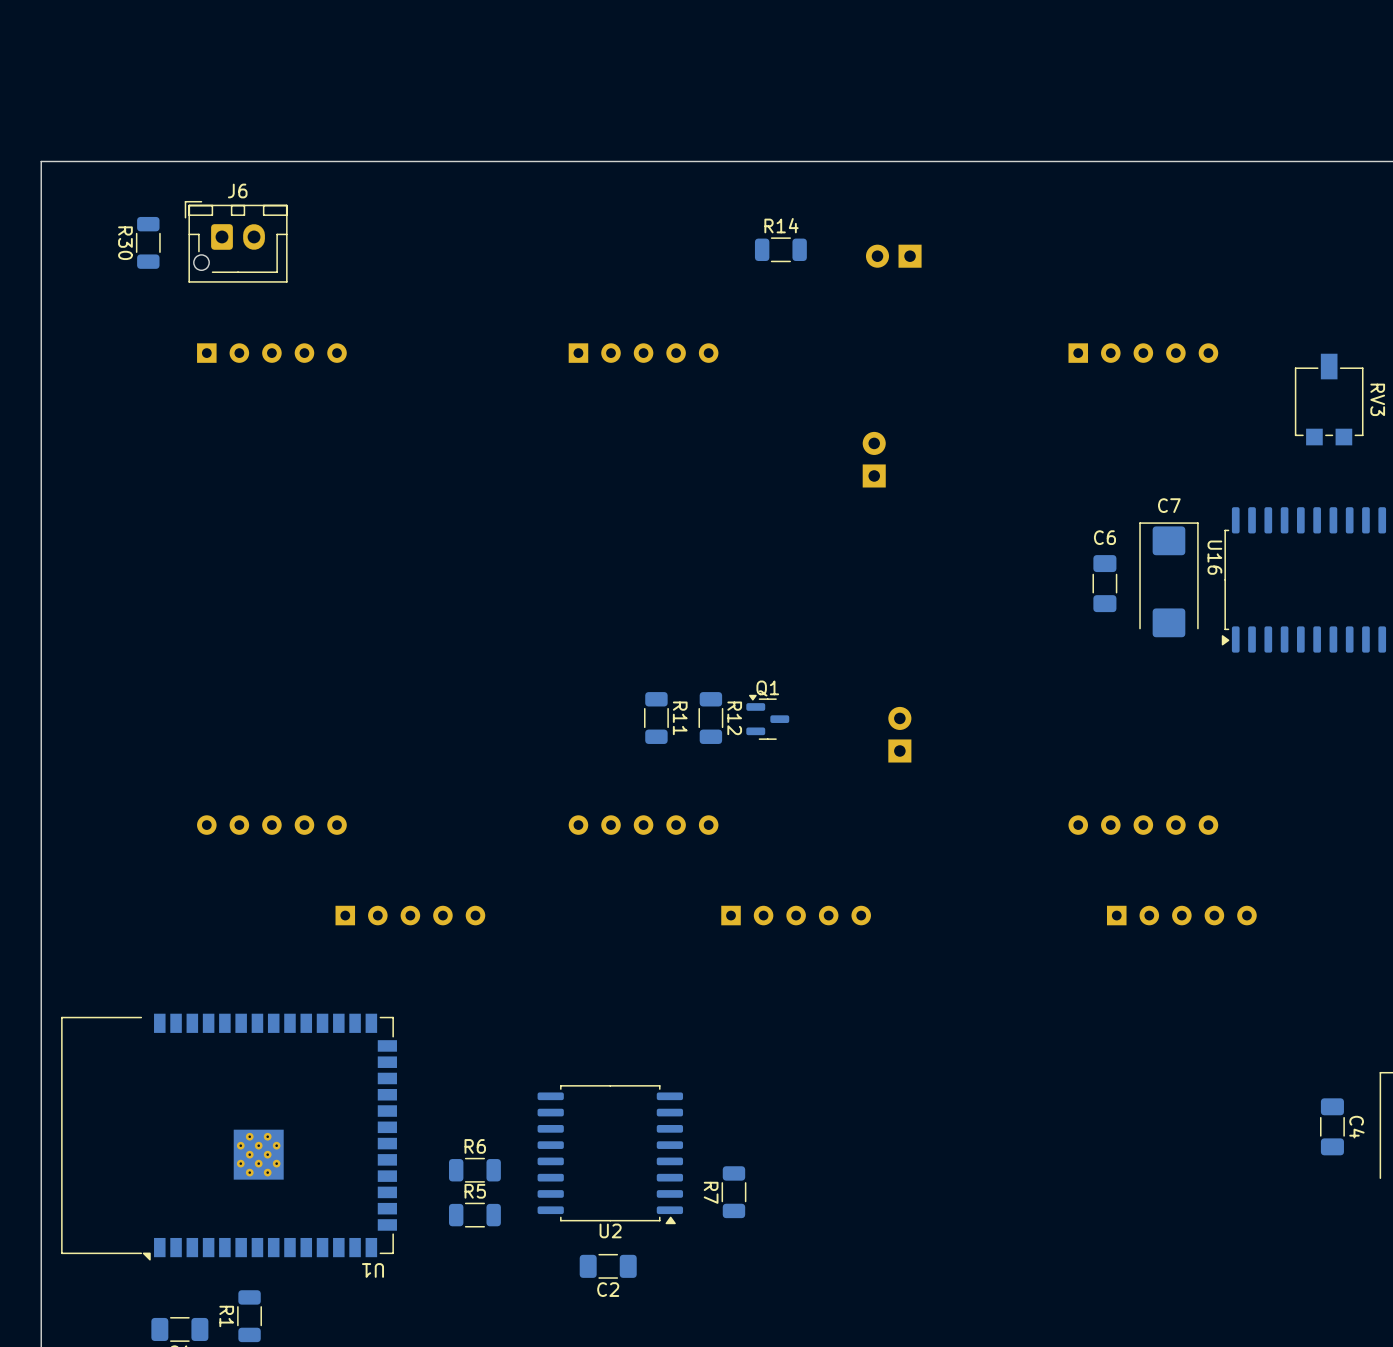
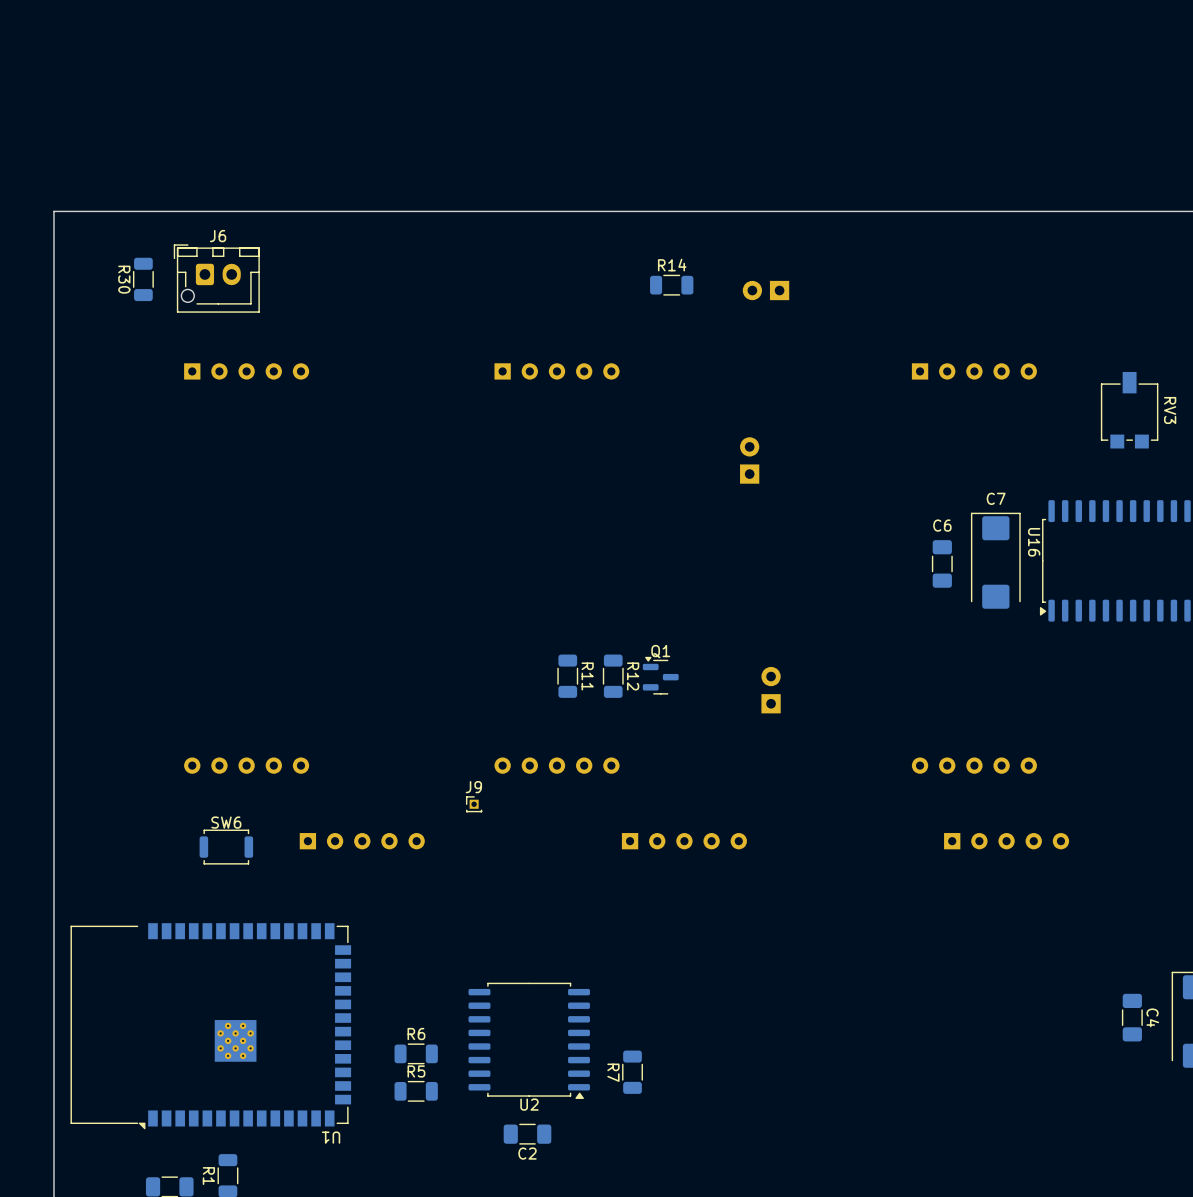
J9: none -> (474, 804)
SW6: none -> (226, 847)

